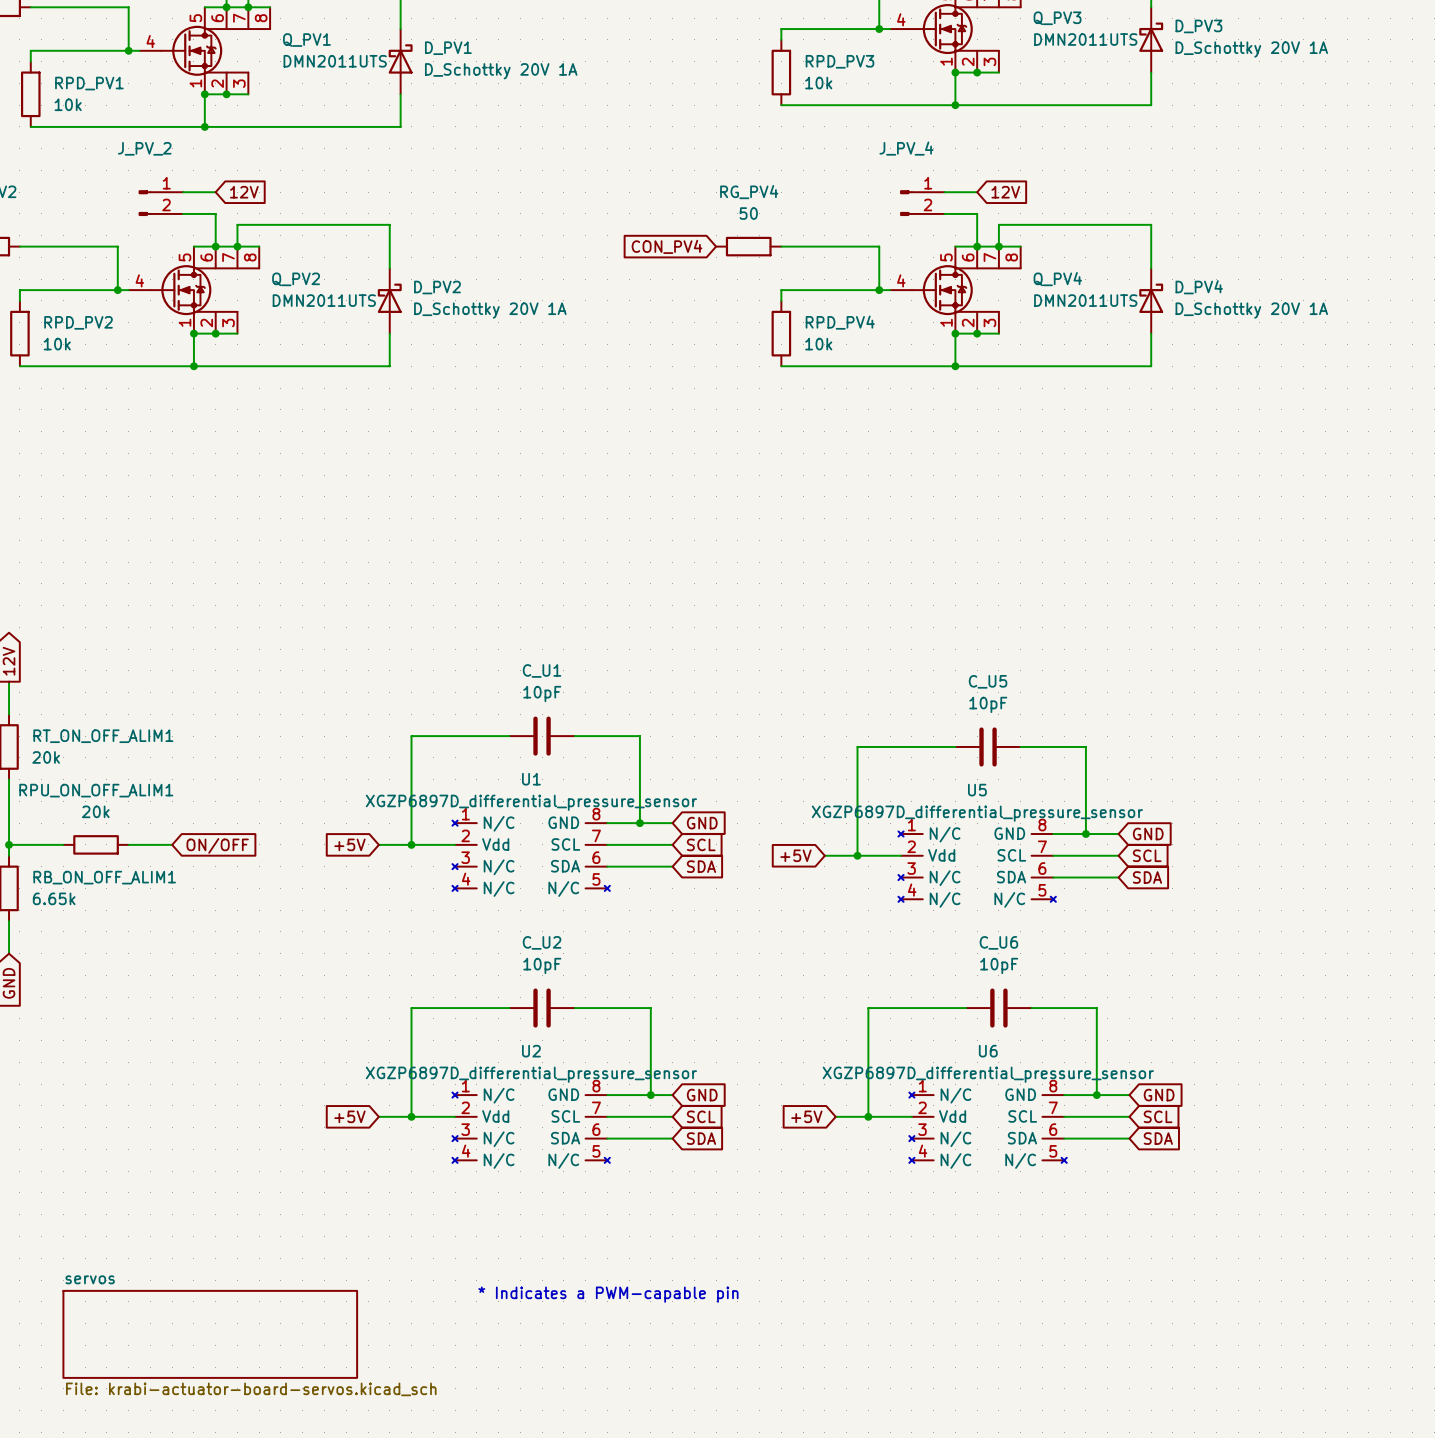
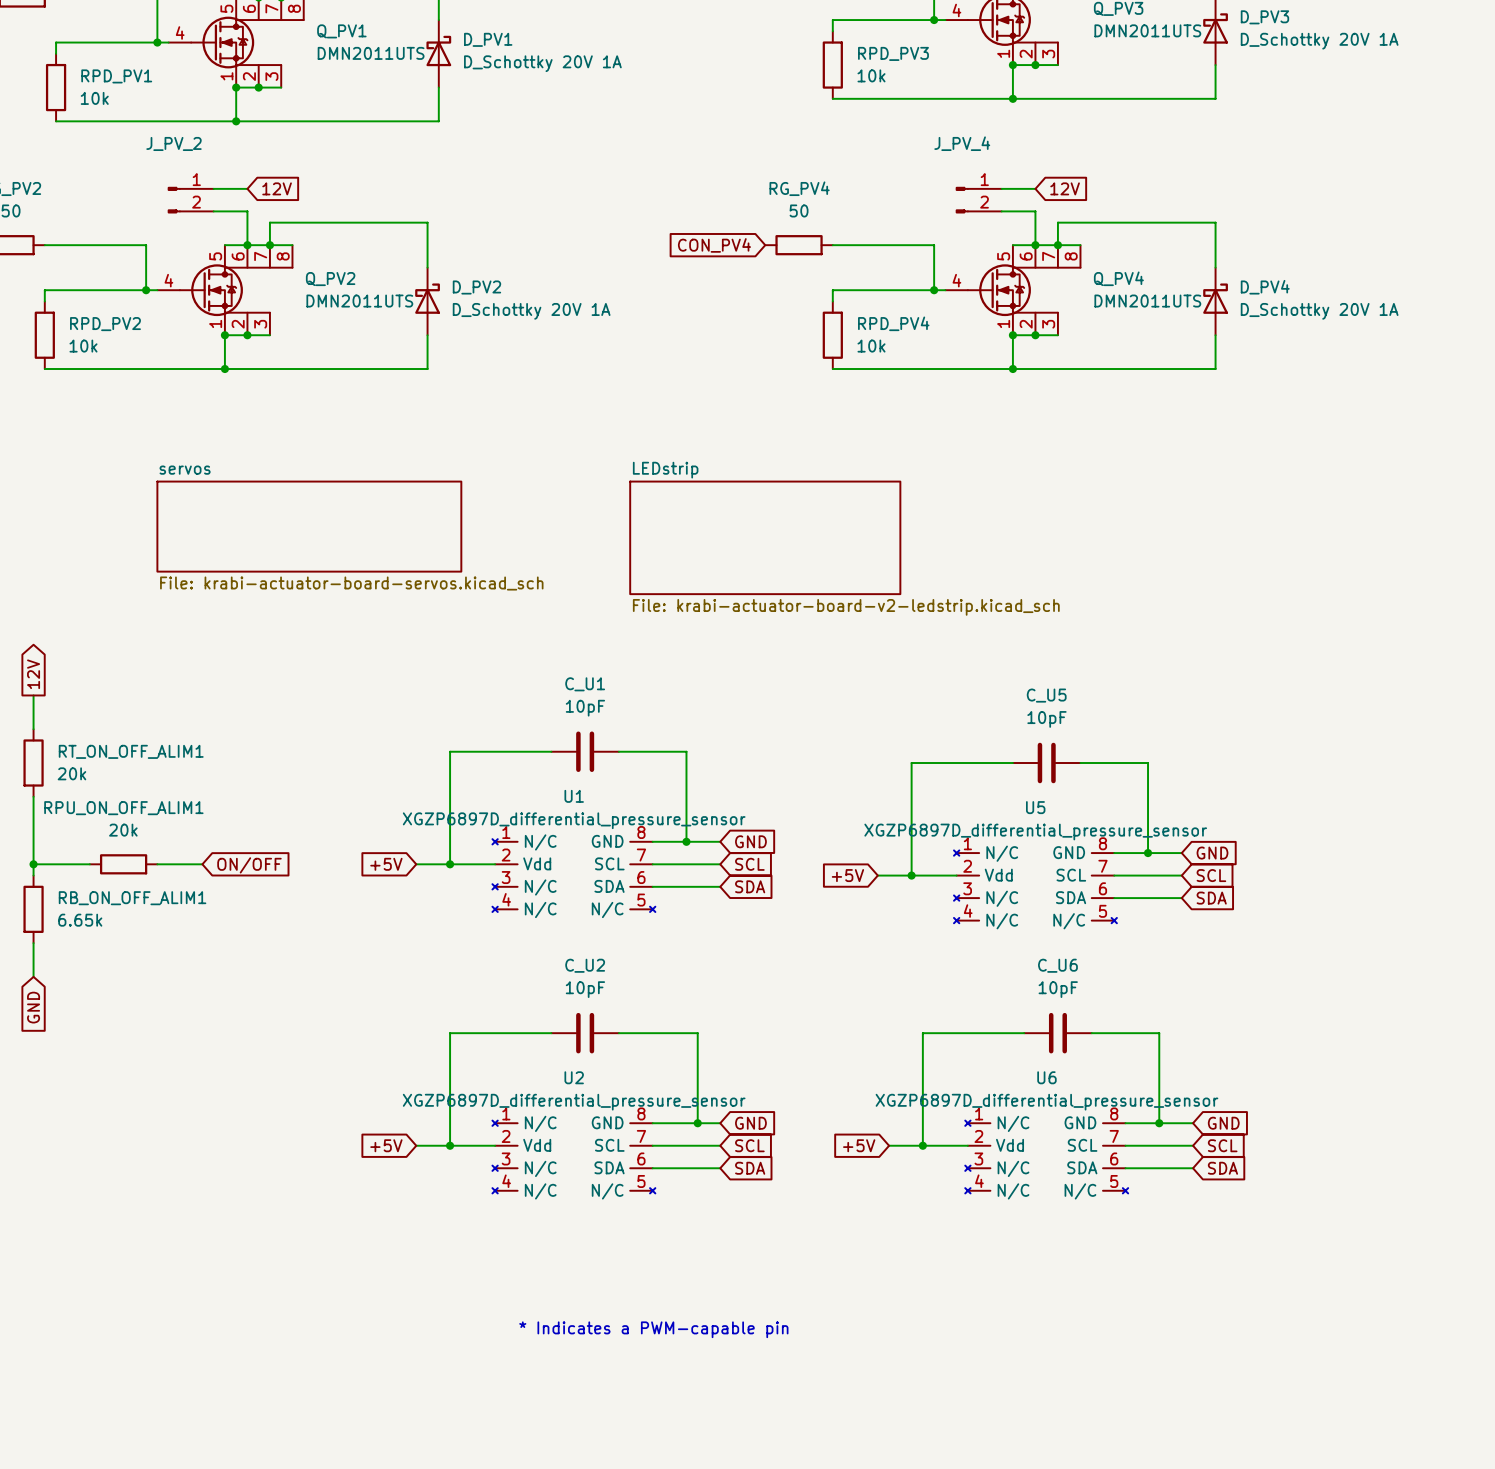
sheet servos: none -> File: krabi-actuator-board-servos.kicad_sch (309, 526)
sheet LEDstrip: none -> File: krabi-actuator-board-v2-ledstrip.kicad_sch (765, 537)
sheet servos: File: krabi-actuator-board-servos.kicad_sch (210, 1334) -> none

